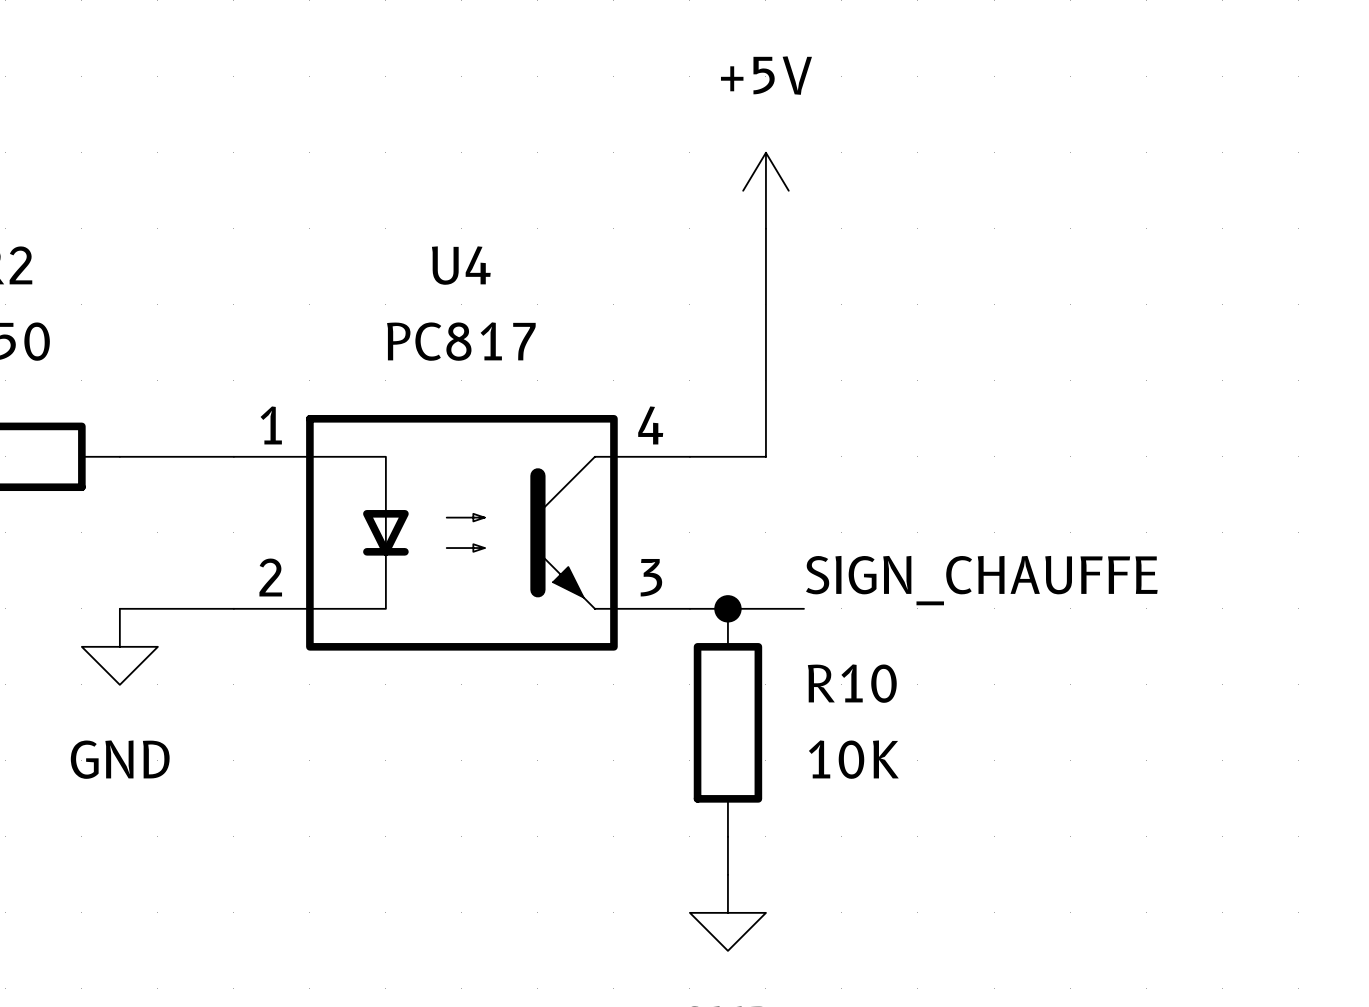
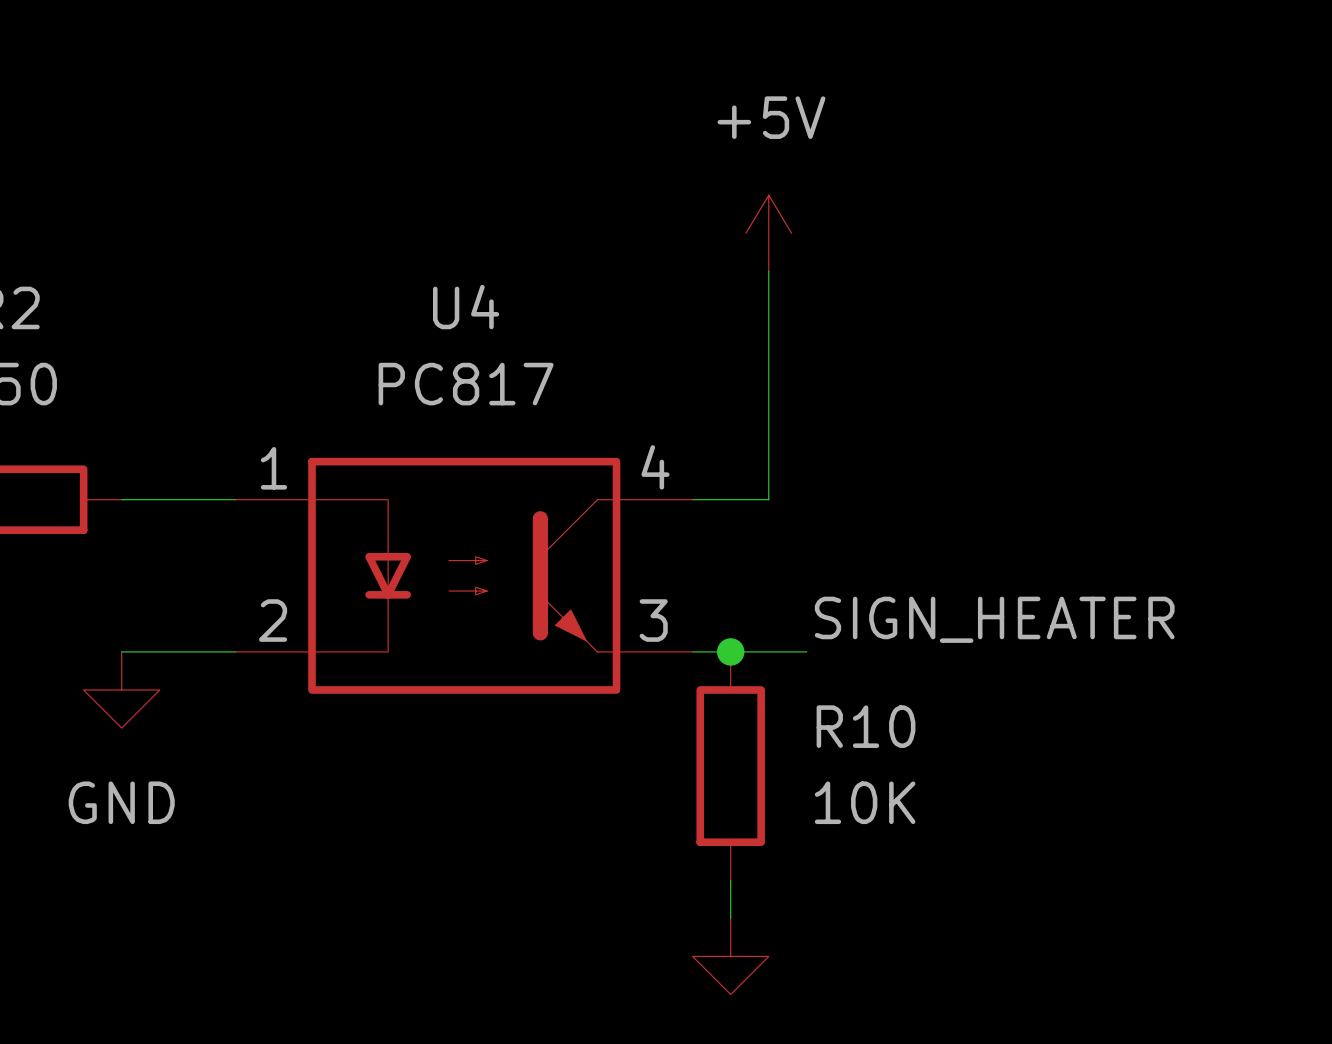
label: SIGN_CHAUFFE (981, 580) -> SIGN_HEATER (994, 619)

